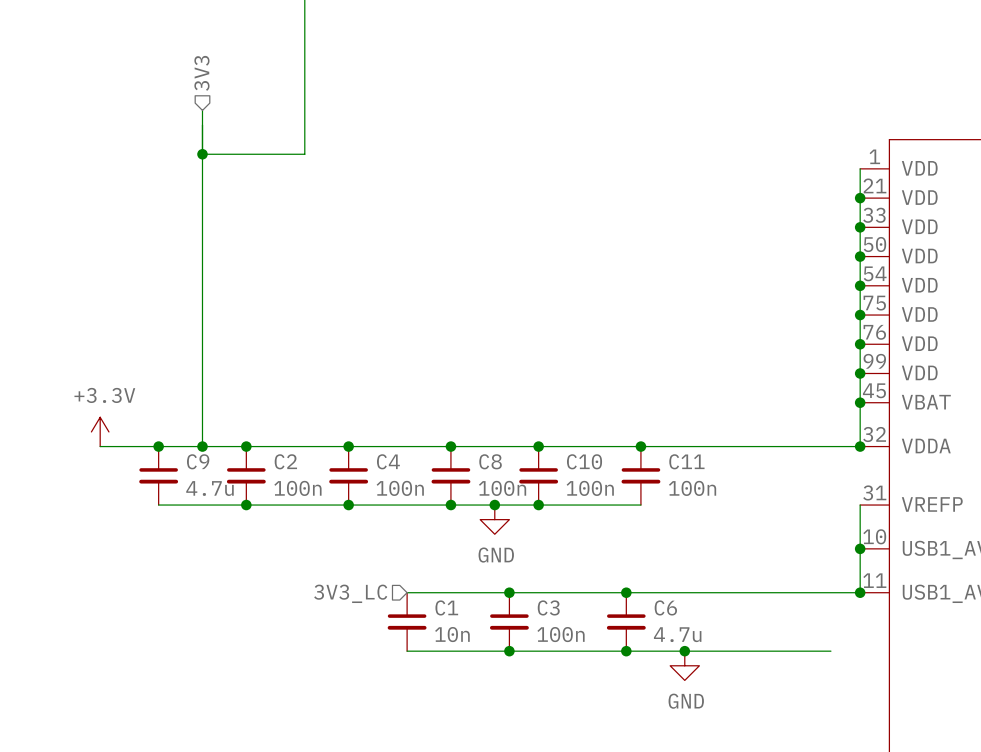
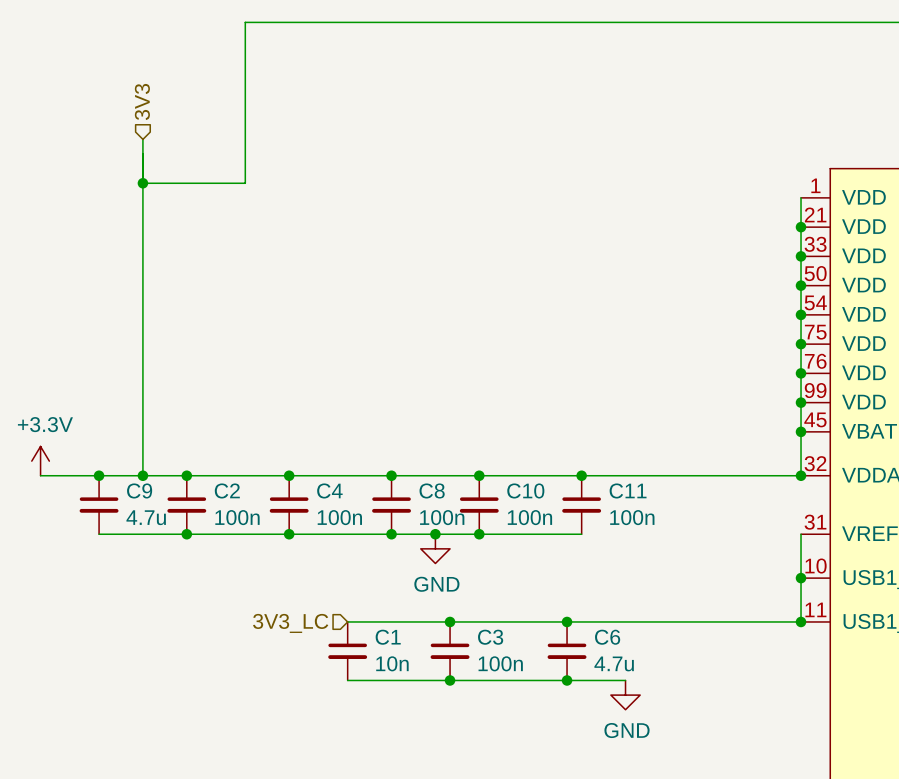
wire: (684, 651) (830, 651) -> none
junction: (684, 651) -> none

